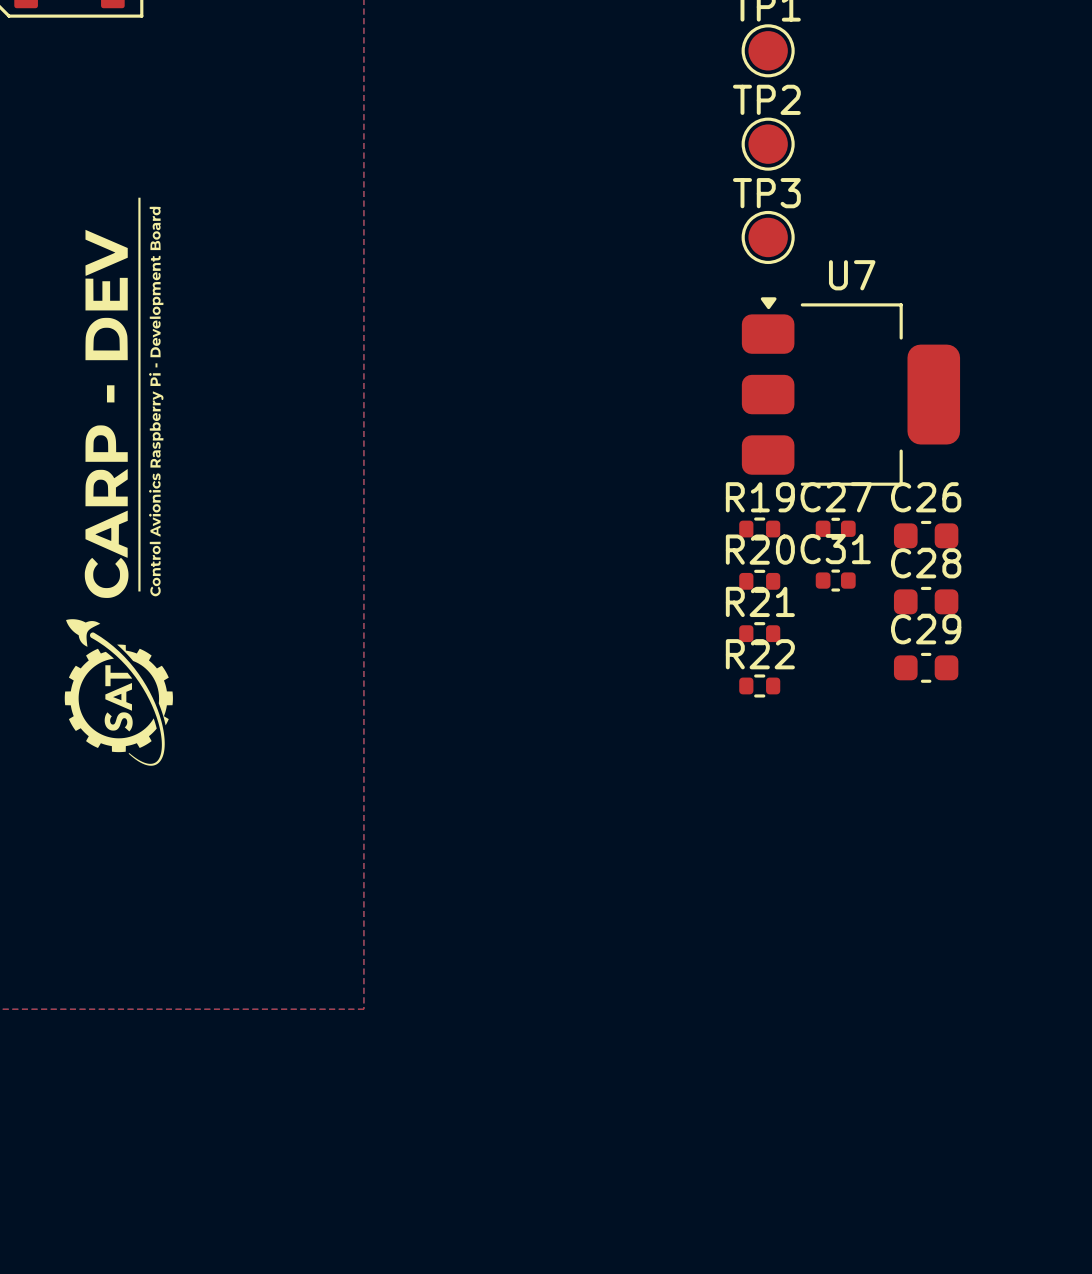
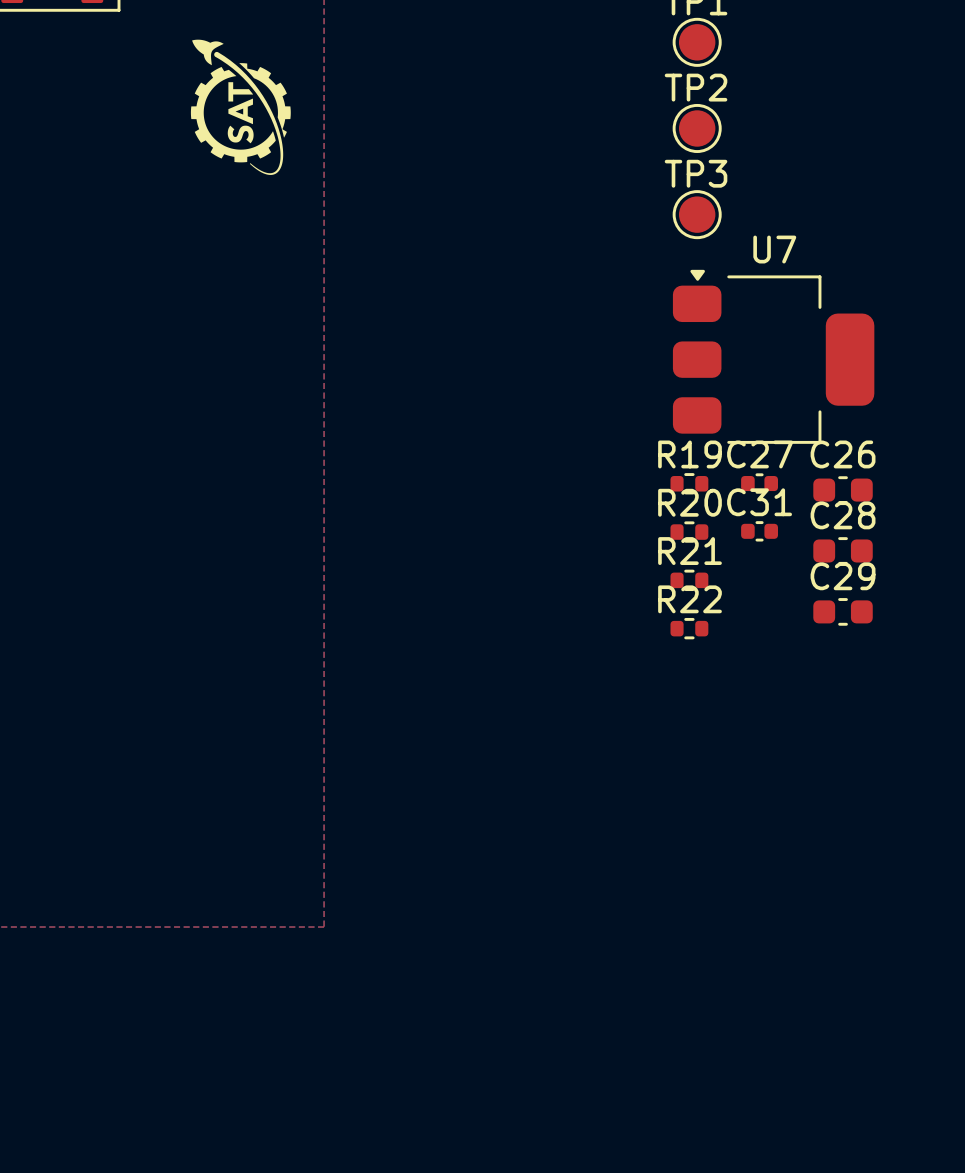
drawing: [84, 197, 164, 598] -> none
drawing position: (83, 633) -> (207, 52)
drawing position: (118, 675) -> (240, 91)
drawing position: (145, 684) -> (264, 100)
drawing position: (118, 696) -> (240, 111)
drawing position: (127, 699) -> (248, 113)
drawing position: (110, 700) -> (233, 114)
drawing position: (118, 721) -> (240, 134)

